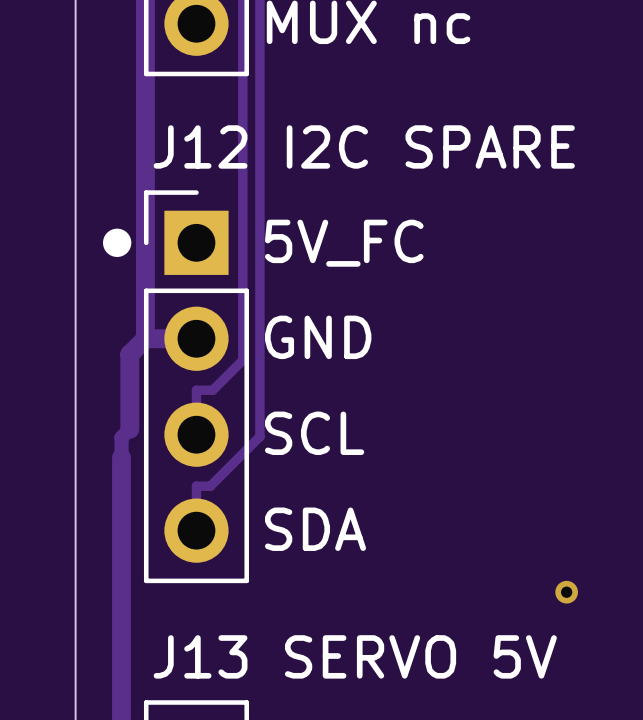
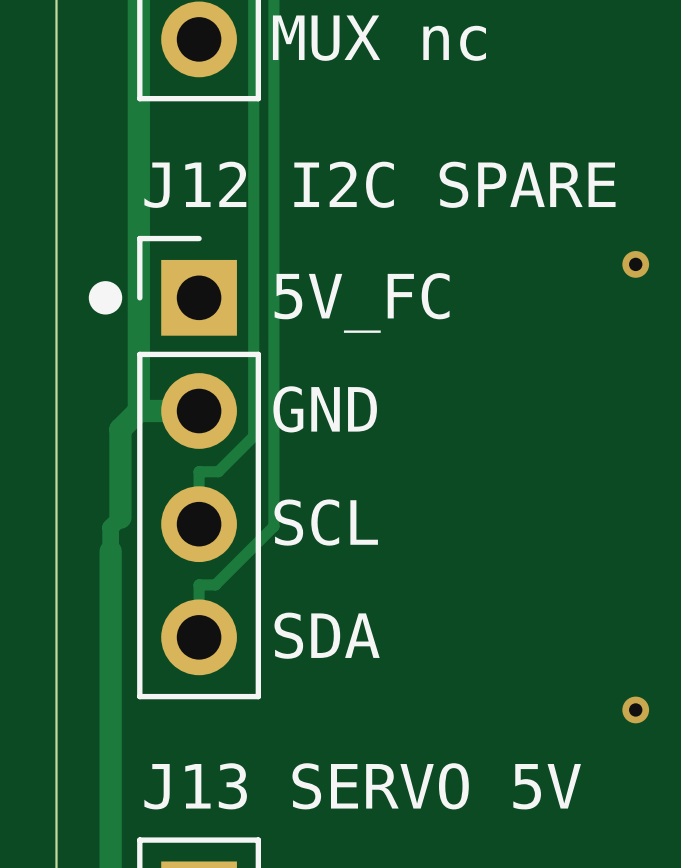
via: none -> (635, 264)

